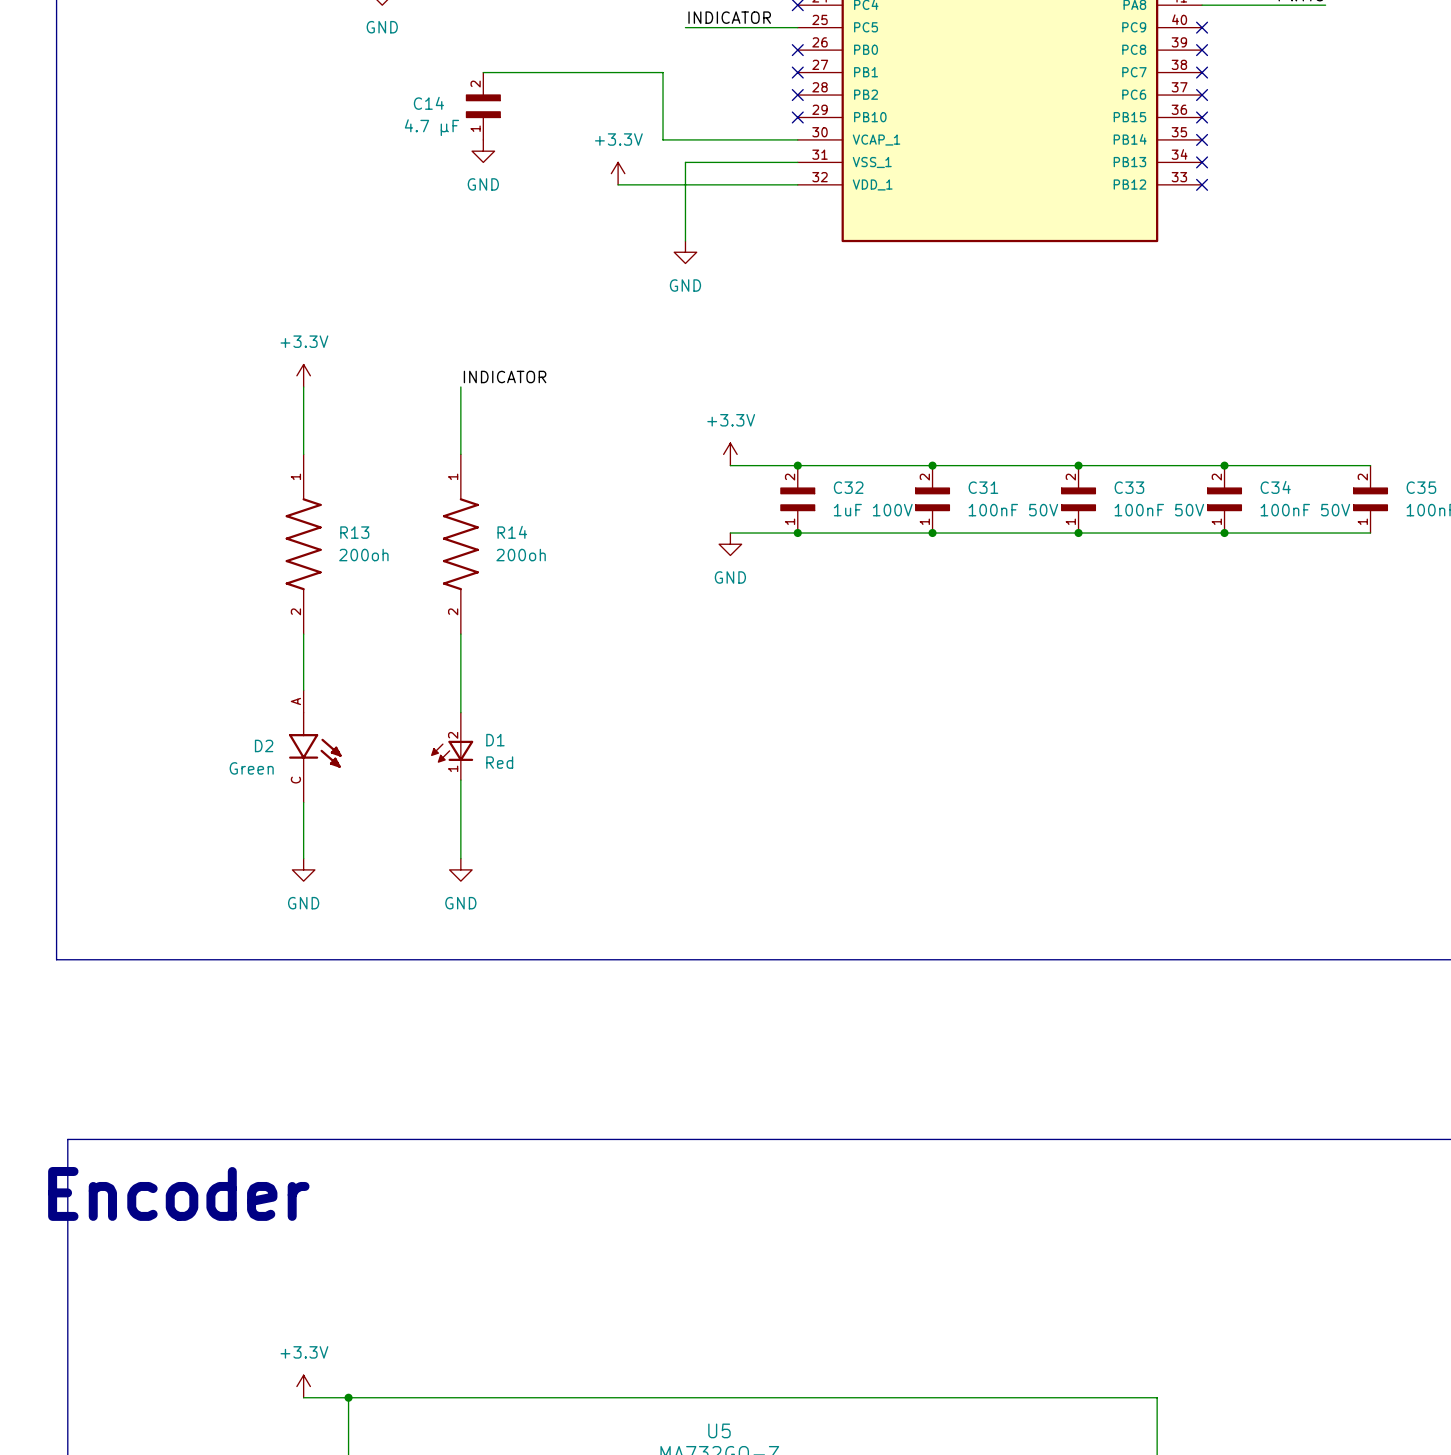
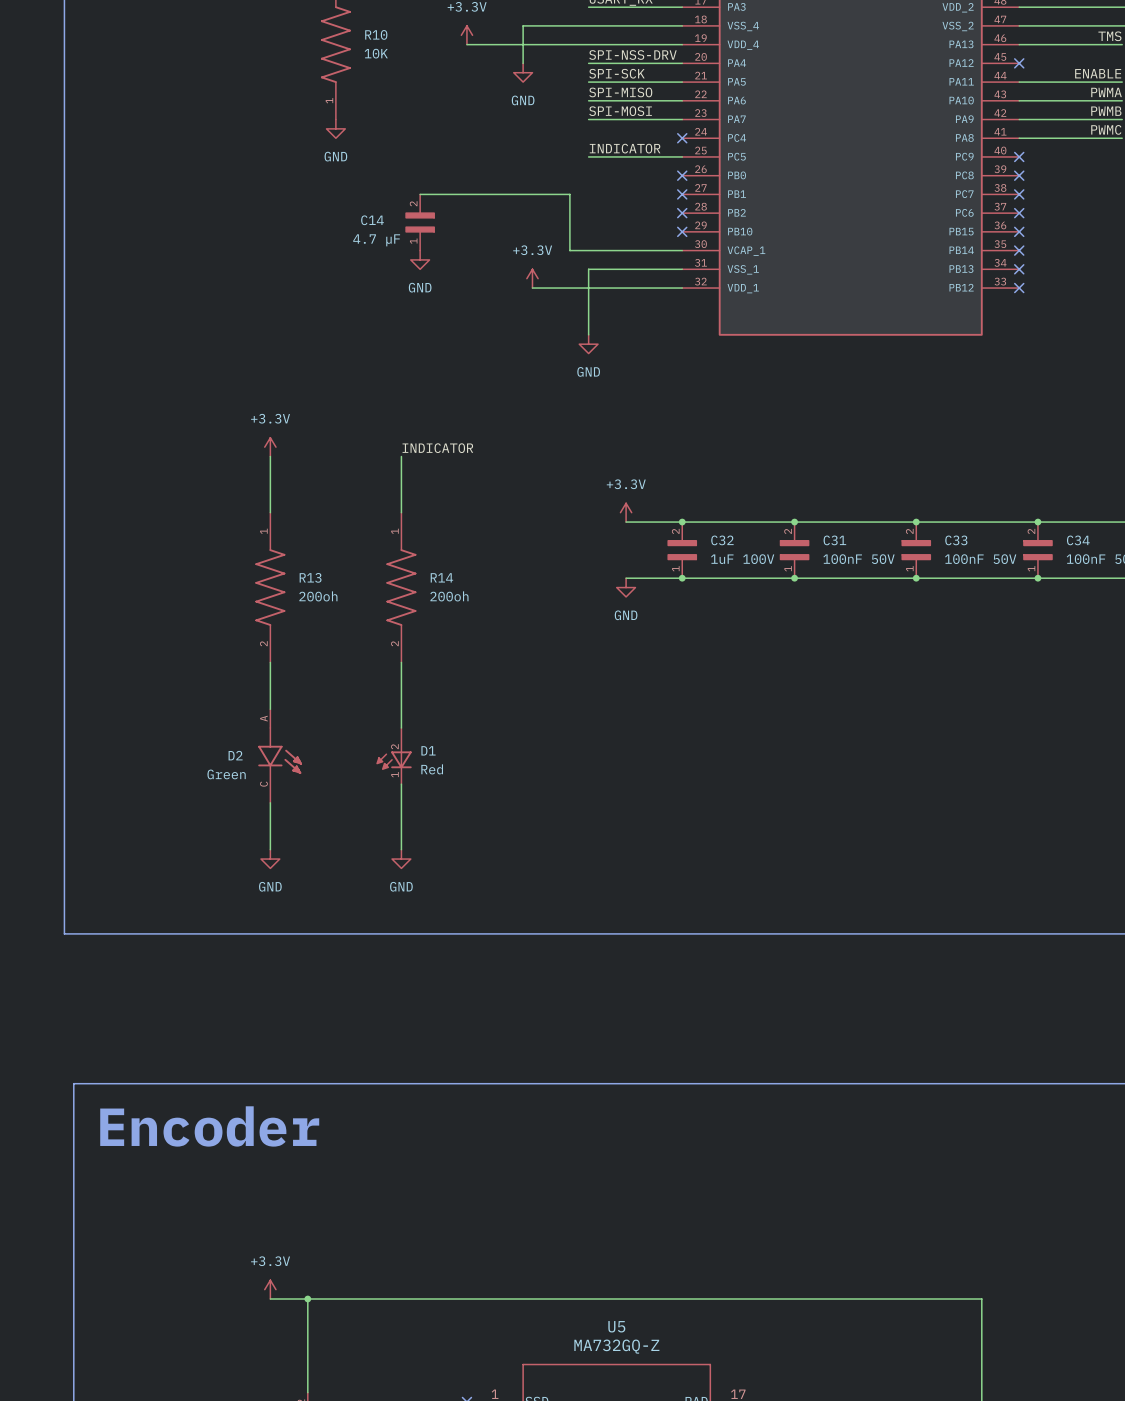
text position: Encoder (178, 1193) -> Encoder (209, 1126)

